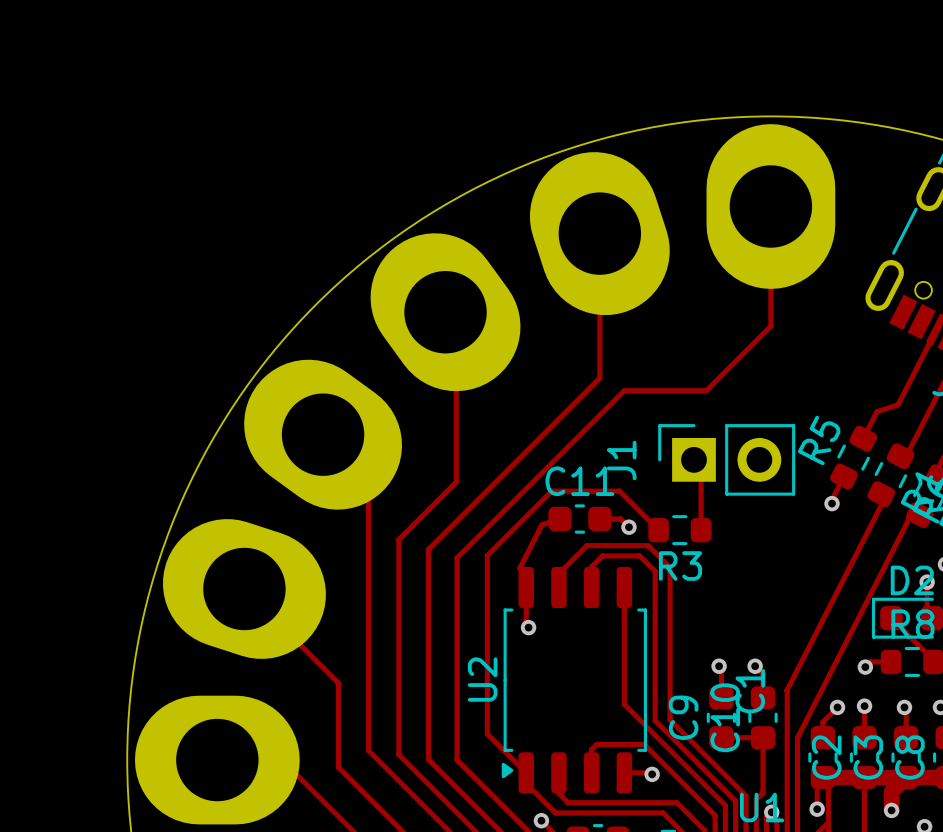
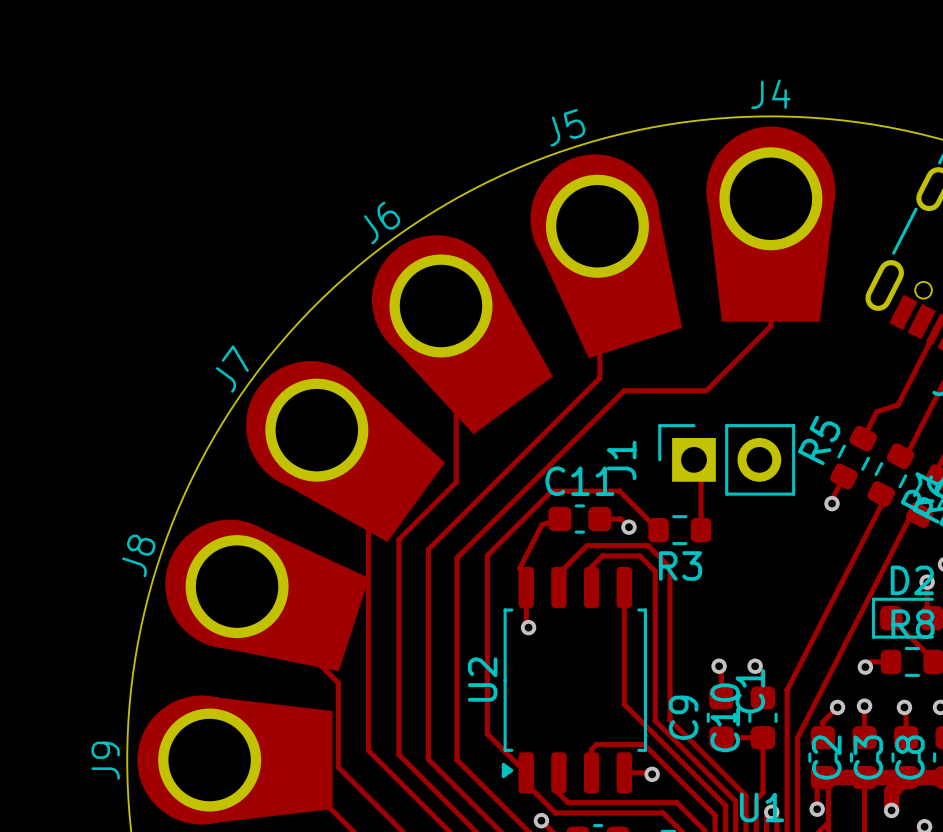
part: (770, 206) -> none
J4: none -> (770, 224)
part: (599, 233) -> none
J5: none -> (606, 256)
part: (445, 312) -> none
J6: none -> (462, 334)
part: (323, 434) -> none
J7: none -> (345, 451)
part: (244, 589) -> none
J8: none -> (267, 595)
part: (217, 760) -> none
J9: none -> (234, 760)

